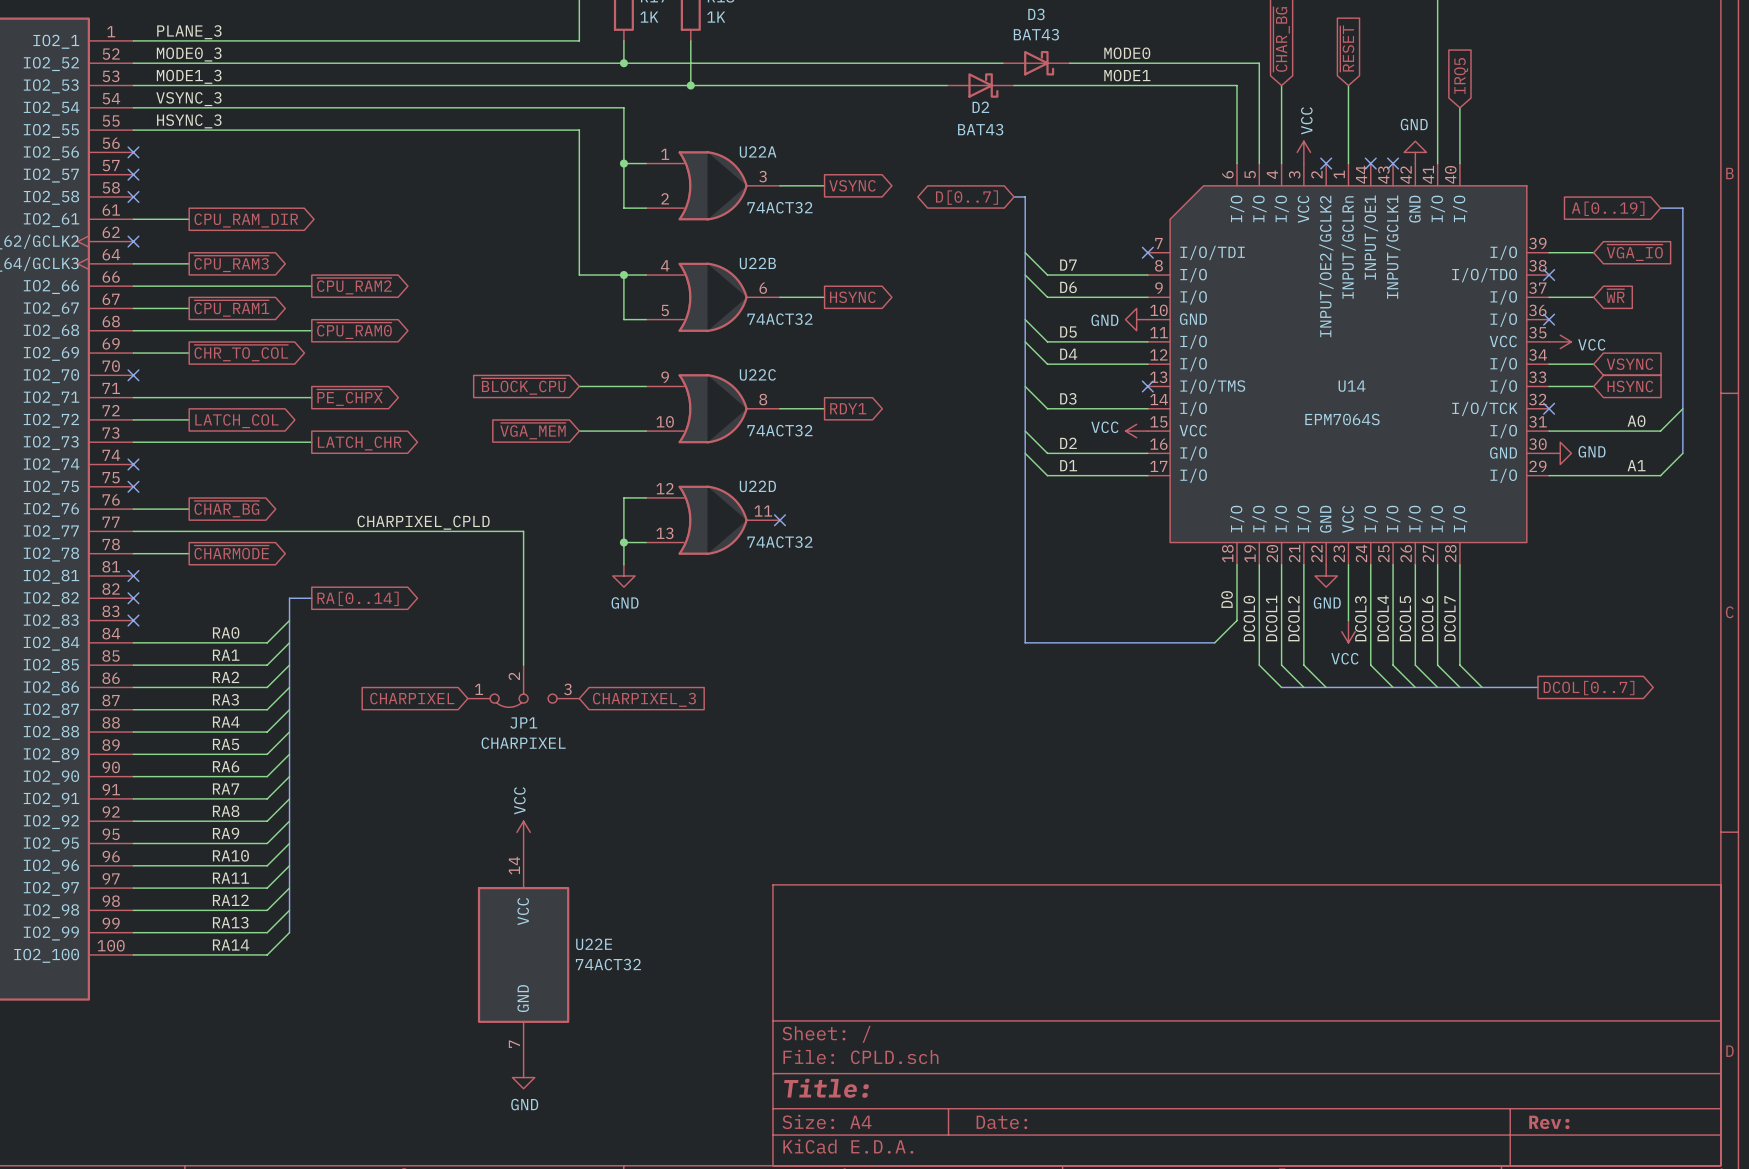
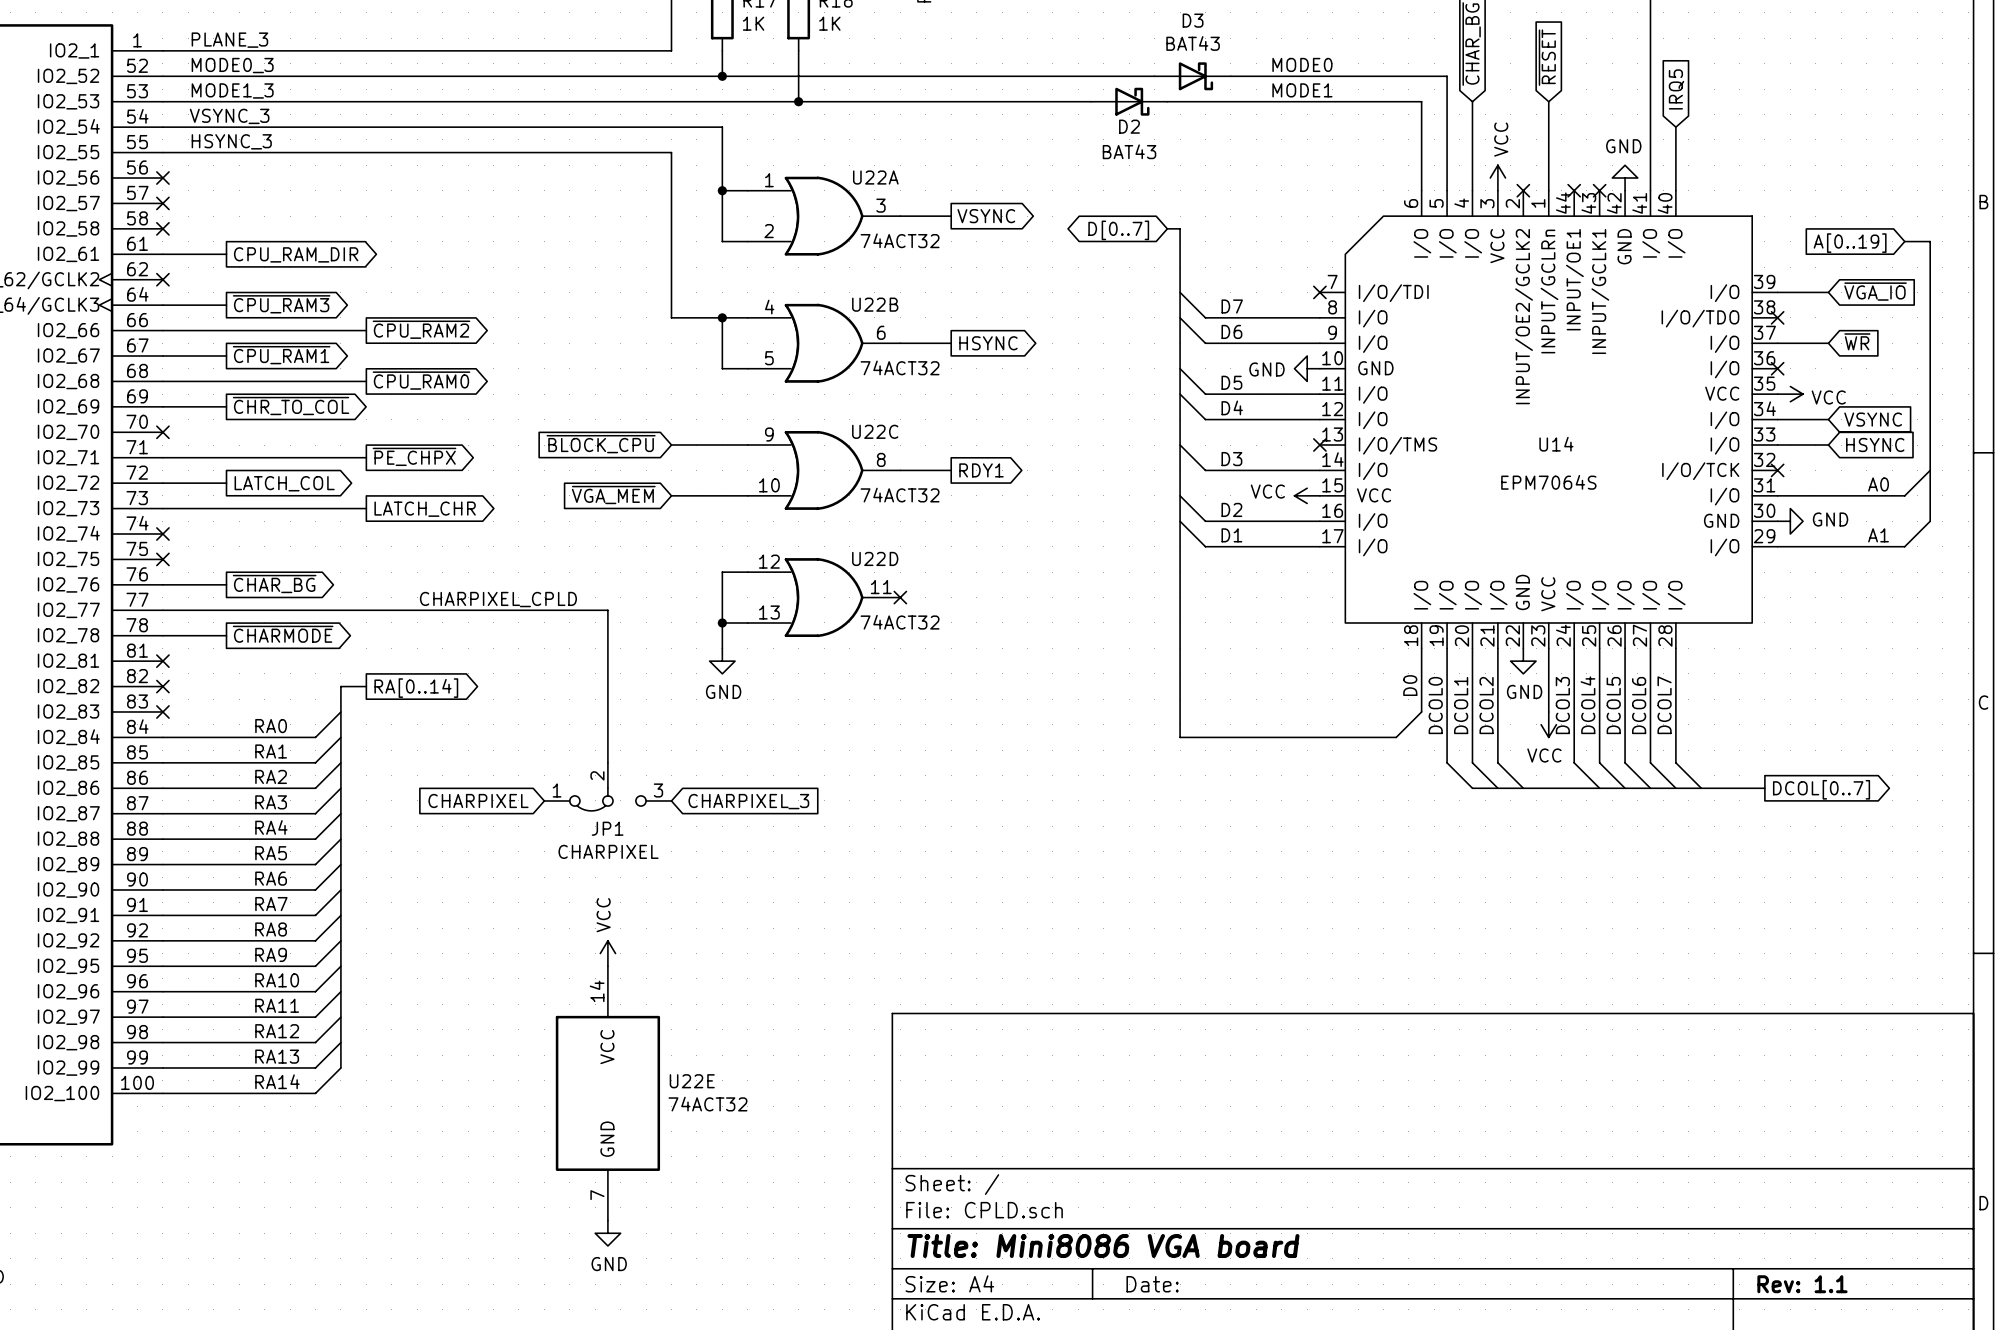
title block: Title: (826, 1088) -> Title: Mini8086 VGA board (1103, 1246)
title block: Rev: (1549, 1122) -> Rev: 1.1 (1802, 1284)

